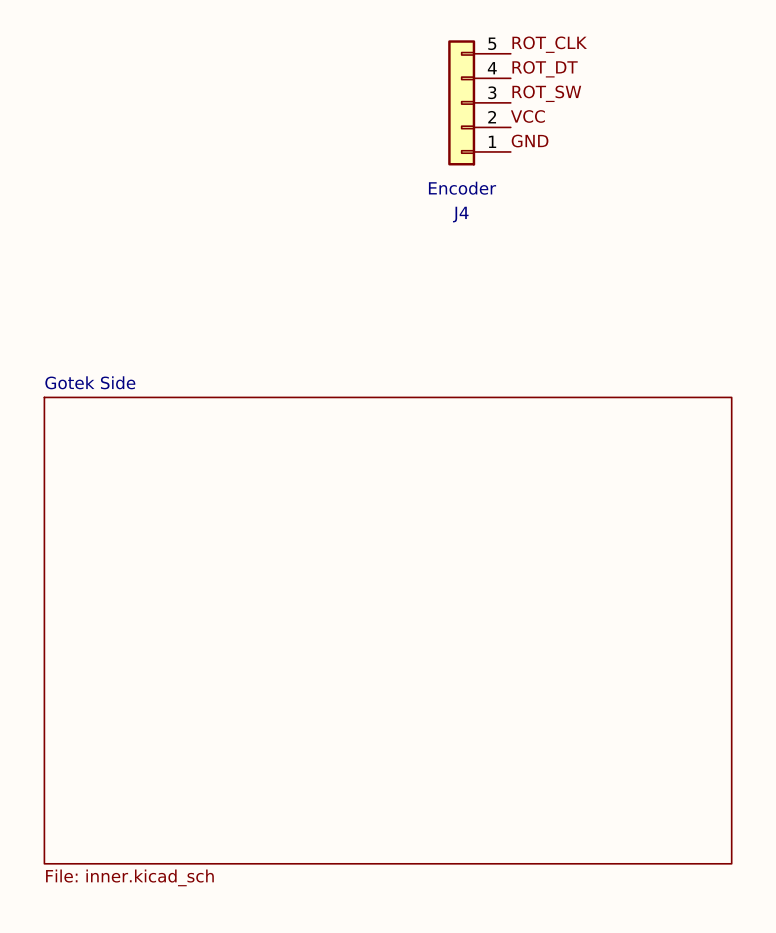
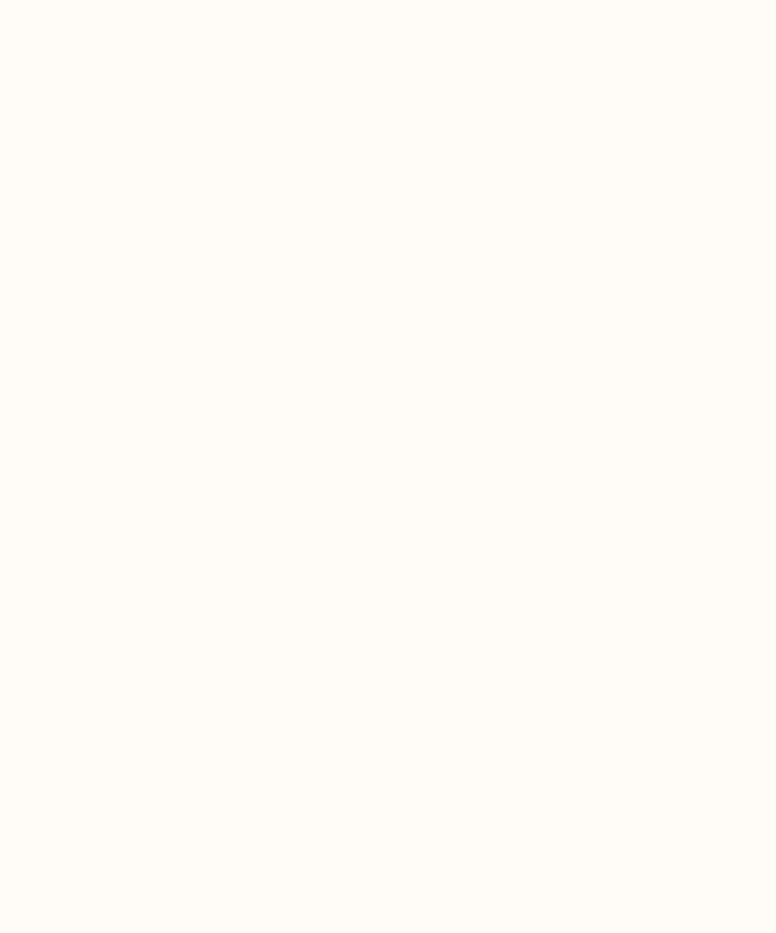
label: ROT_CLK (549, 44) -> none
label: ROT_DT (545, 69) -> none
label: ROT_SW (546, 93) -> none
J4: Encoder (479, 102) -> none
label: VCC (527, 116) -> none
label: GND (530, 141) -> none
sheet Gotek Side: File: inner.kicad_sch (388, 630) -> none

